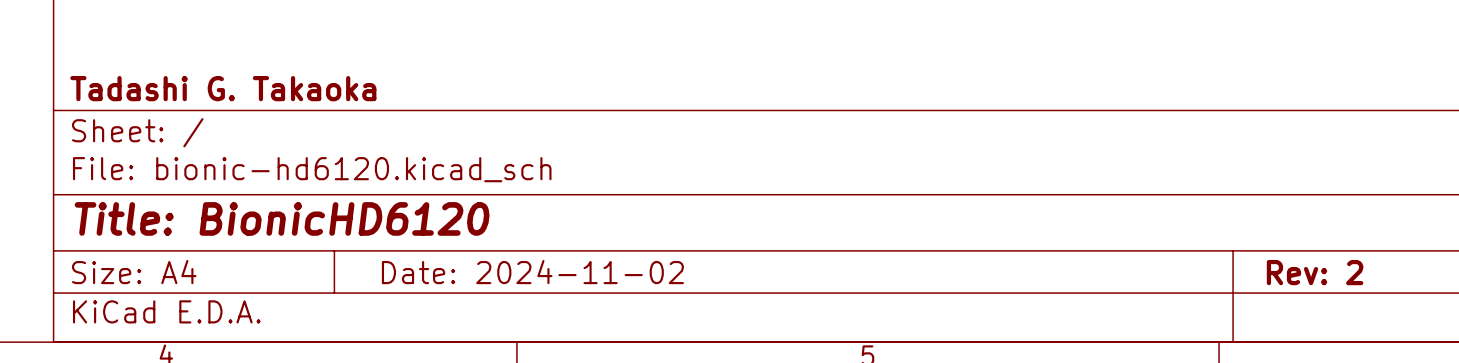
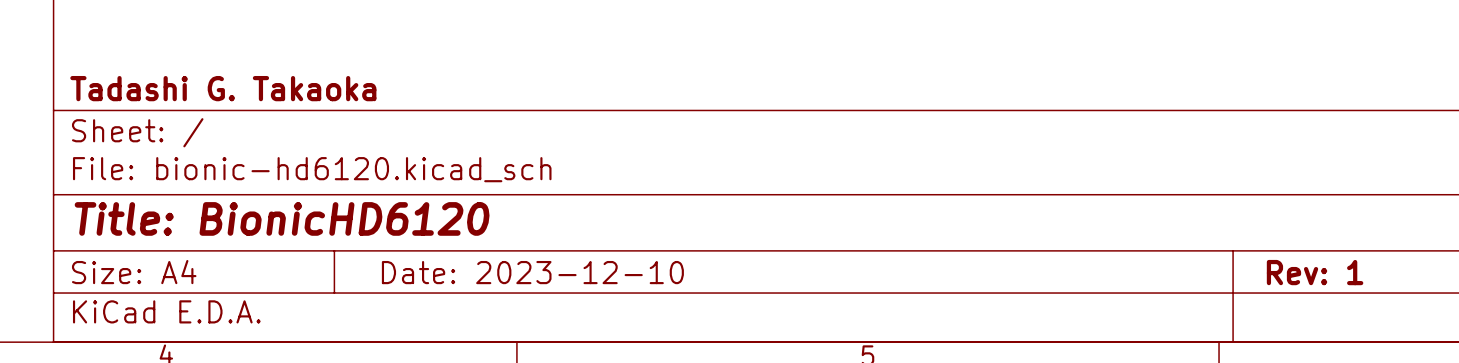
title block: Date: 2024-11-02 (532, 272) -> Date: 2023-12-10 (532, 272)
title block: Rev: 2 (1315, 272) -> Rev: 1 (1315, 272)

